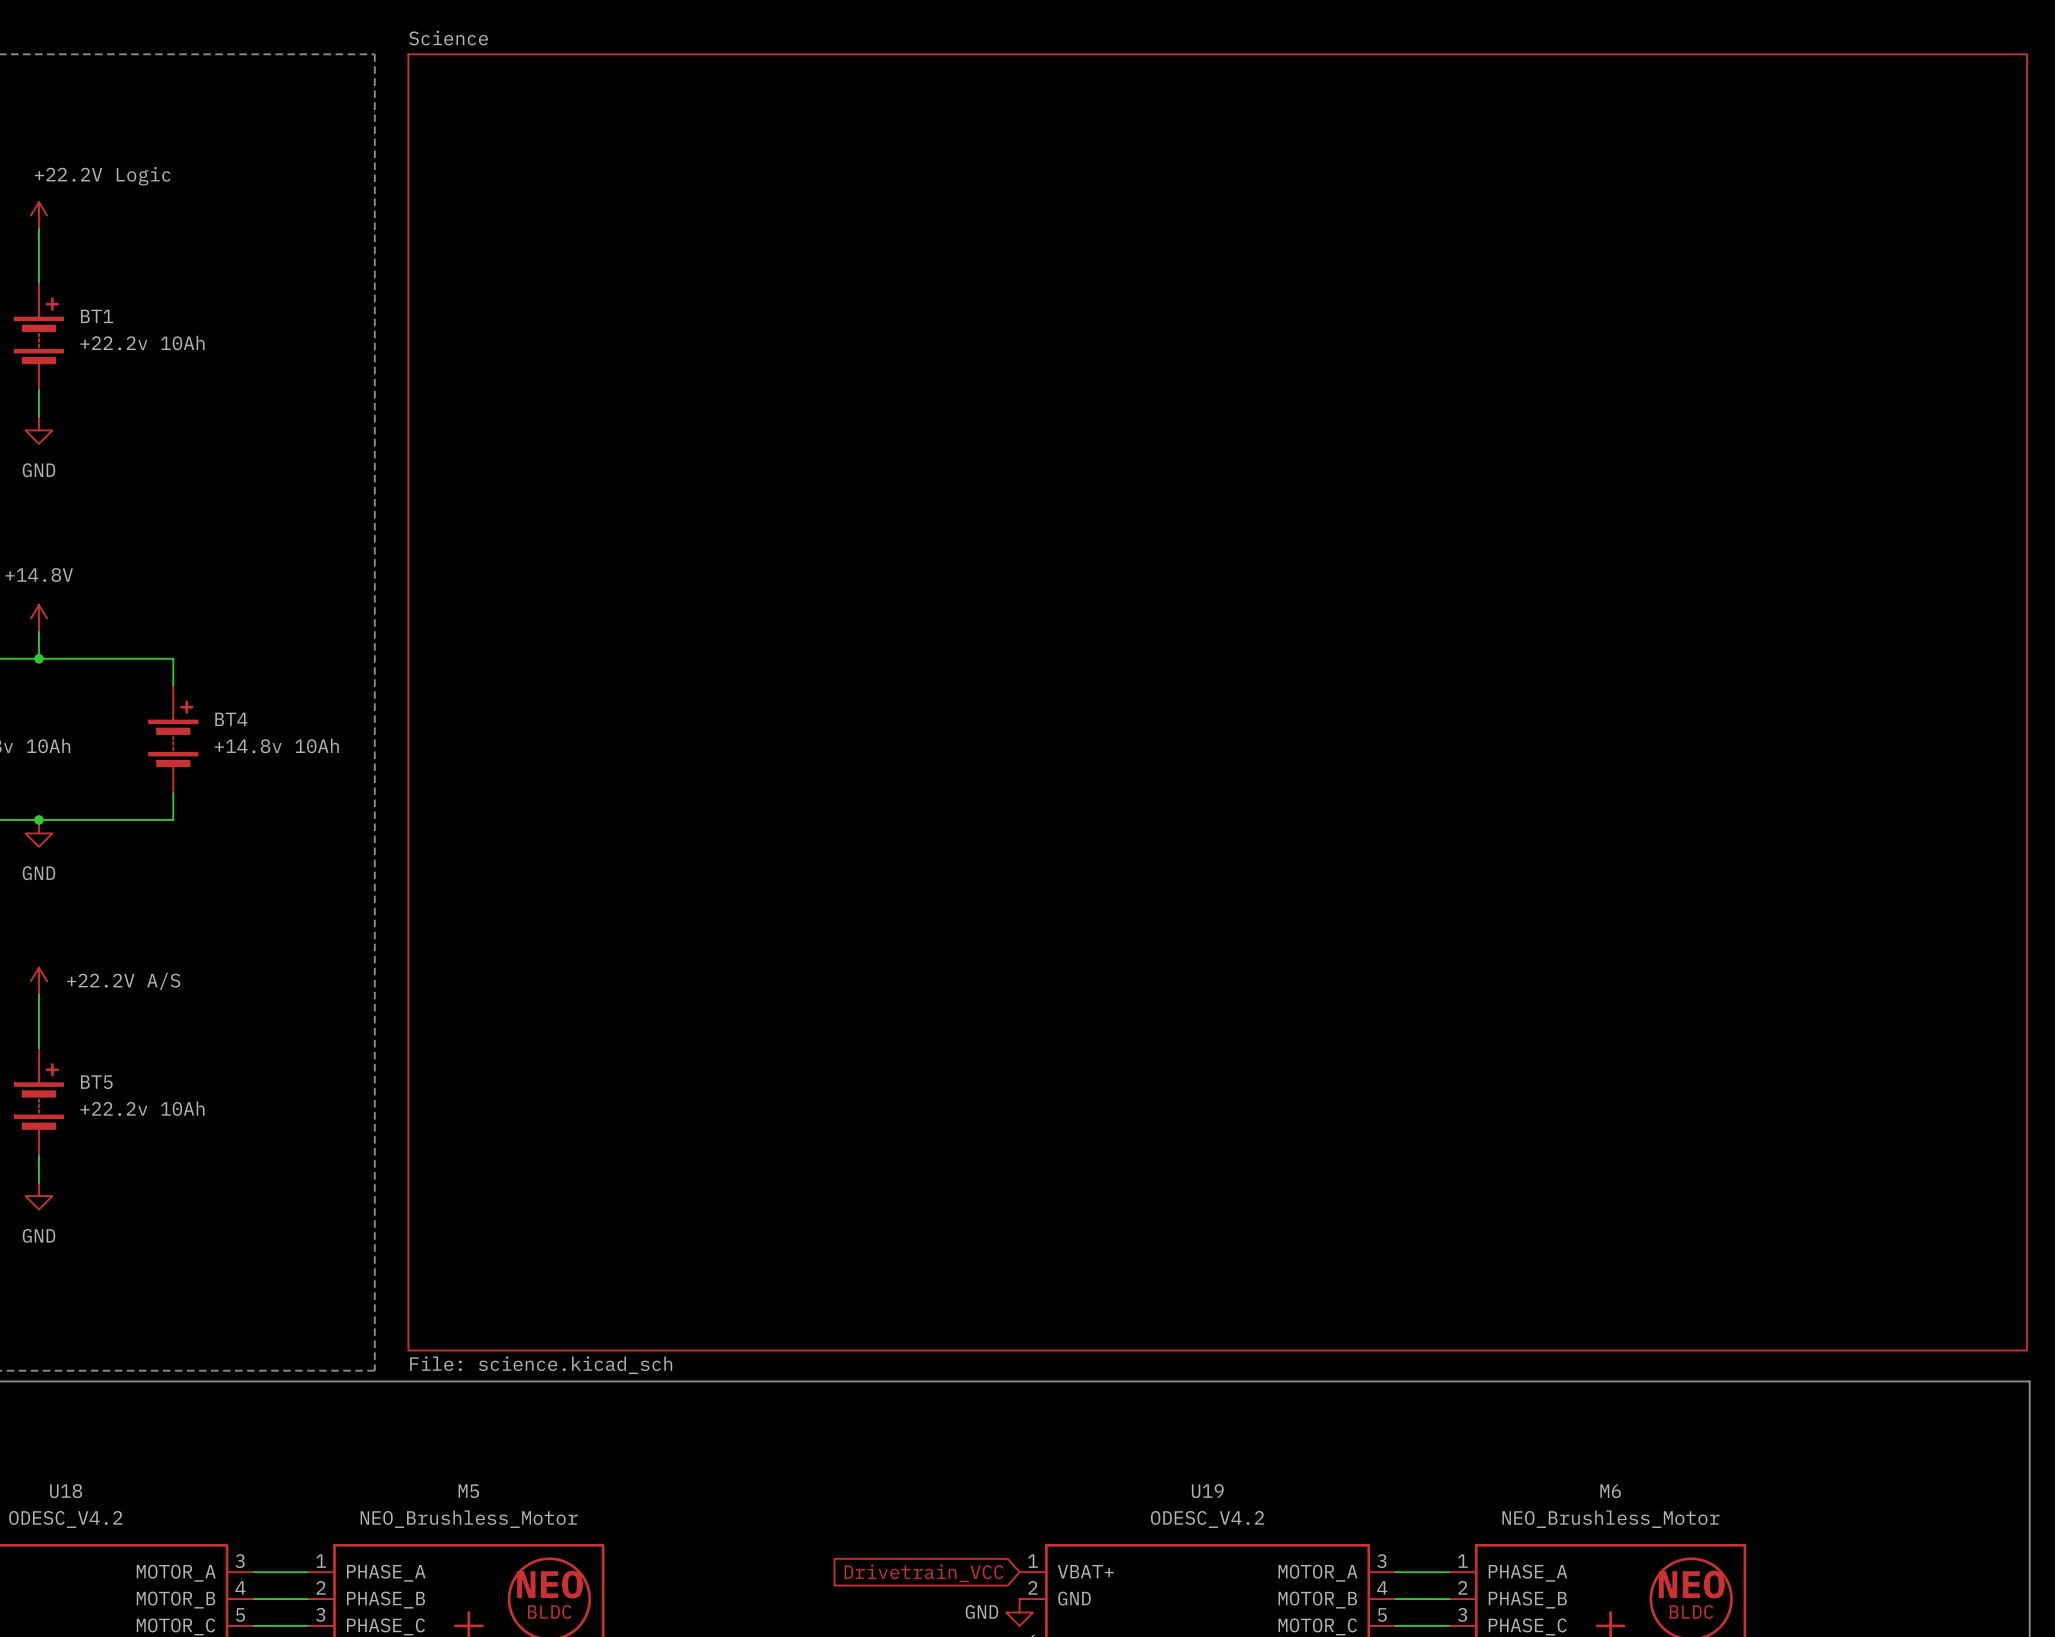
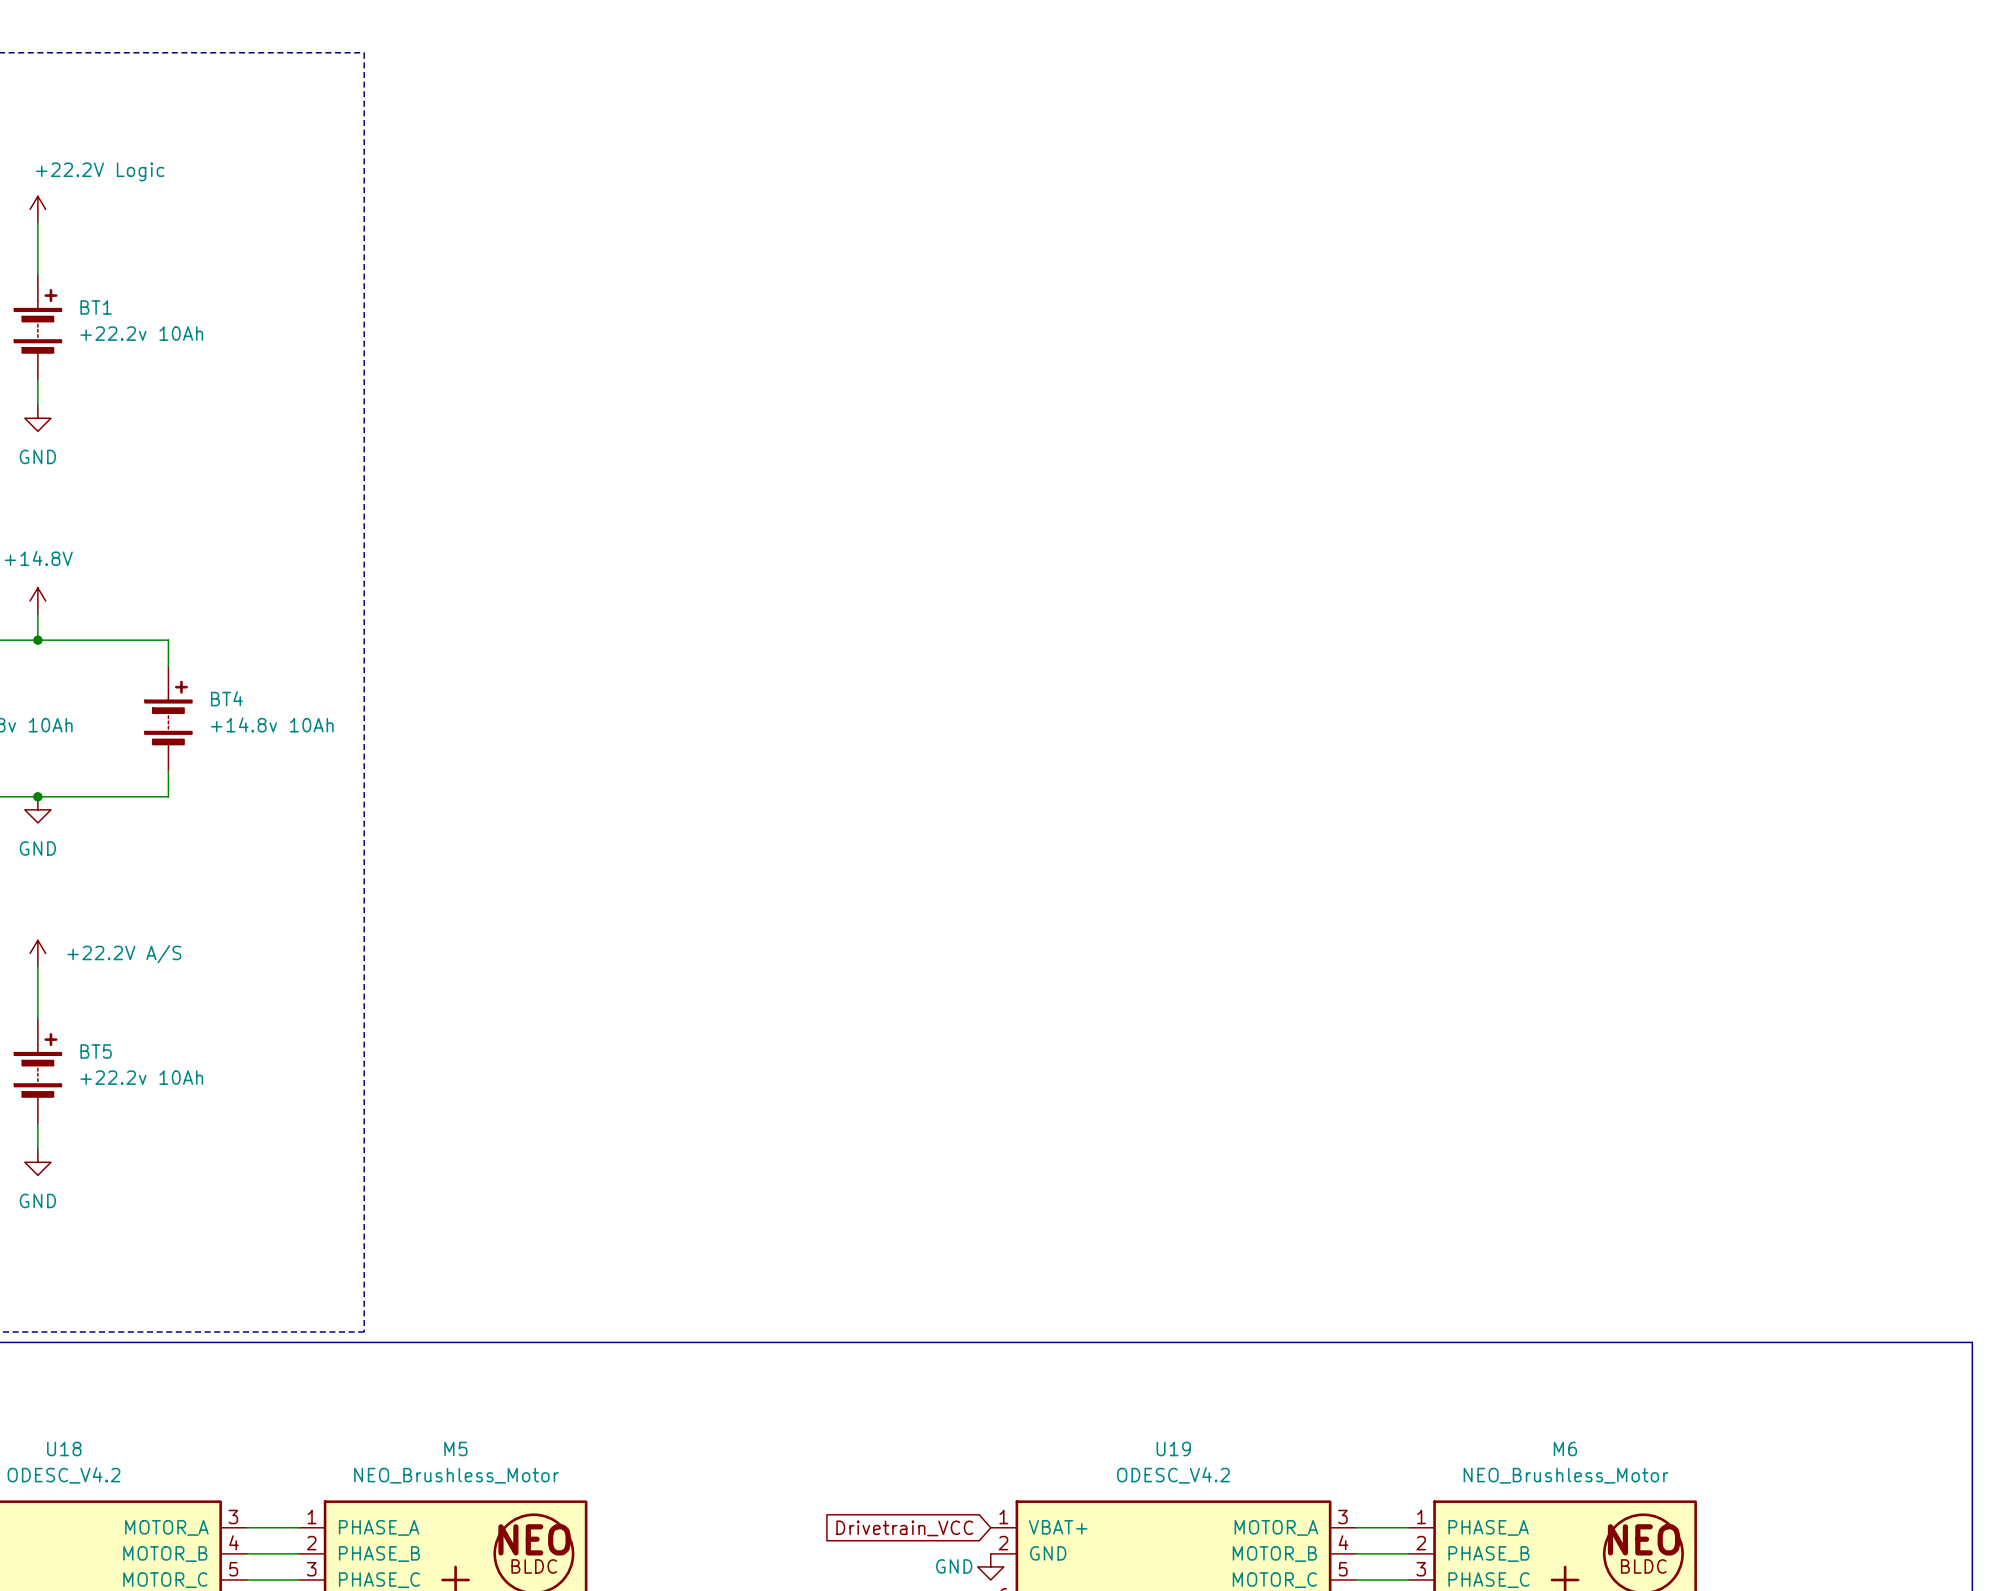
sheet Science: File: science.kicad_sch (1217, 702) -> none

